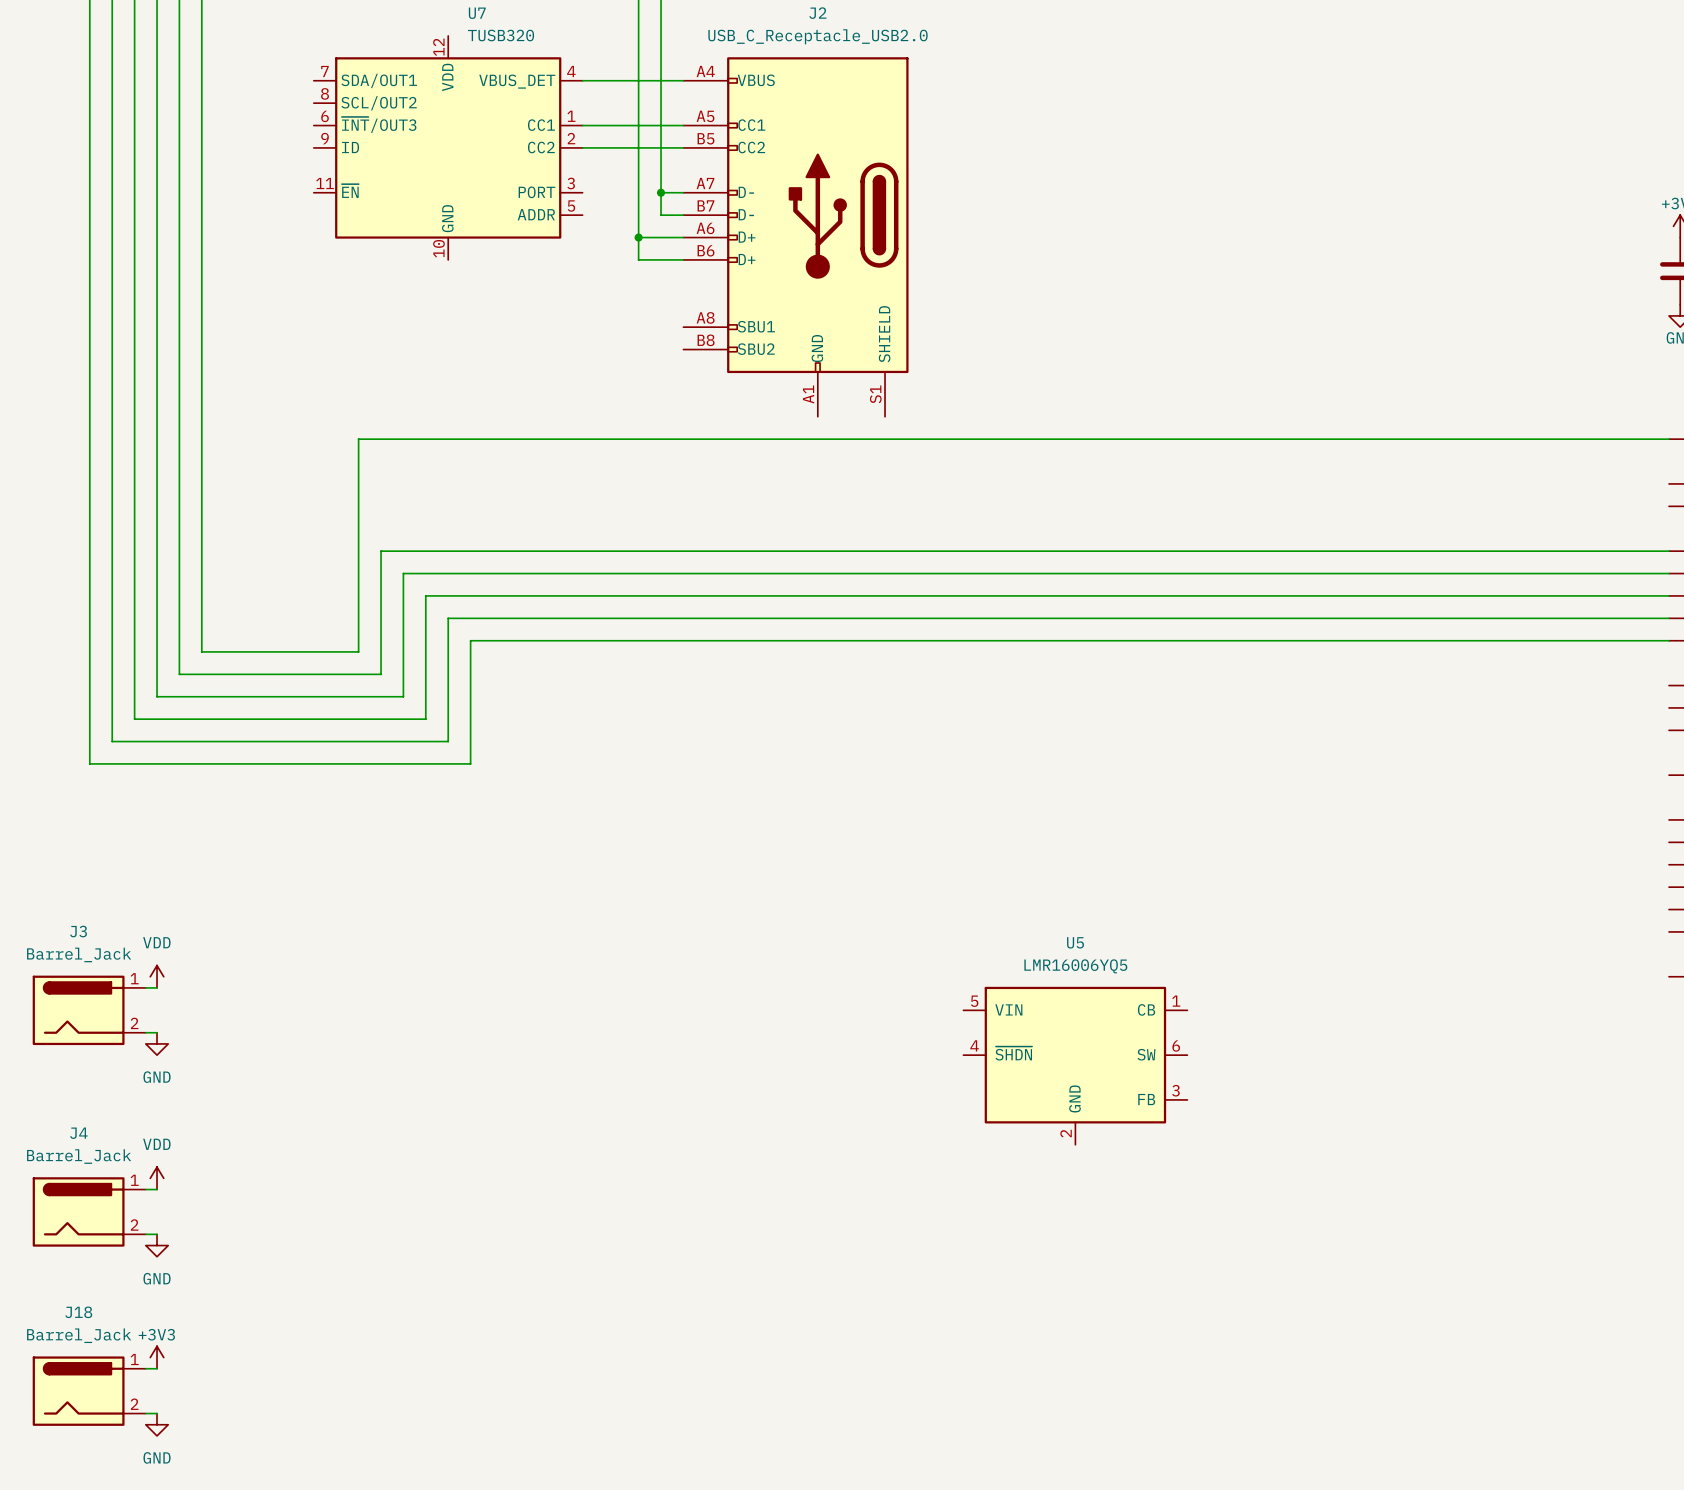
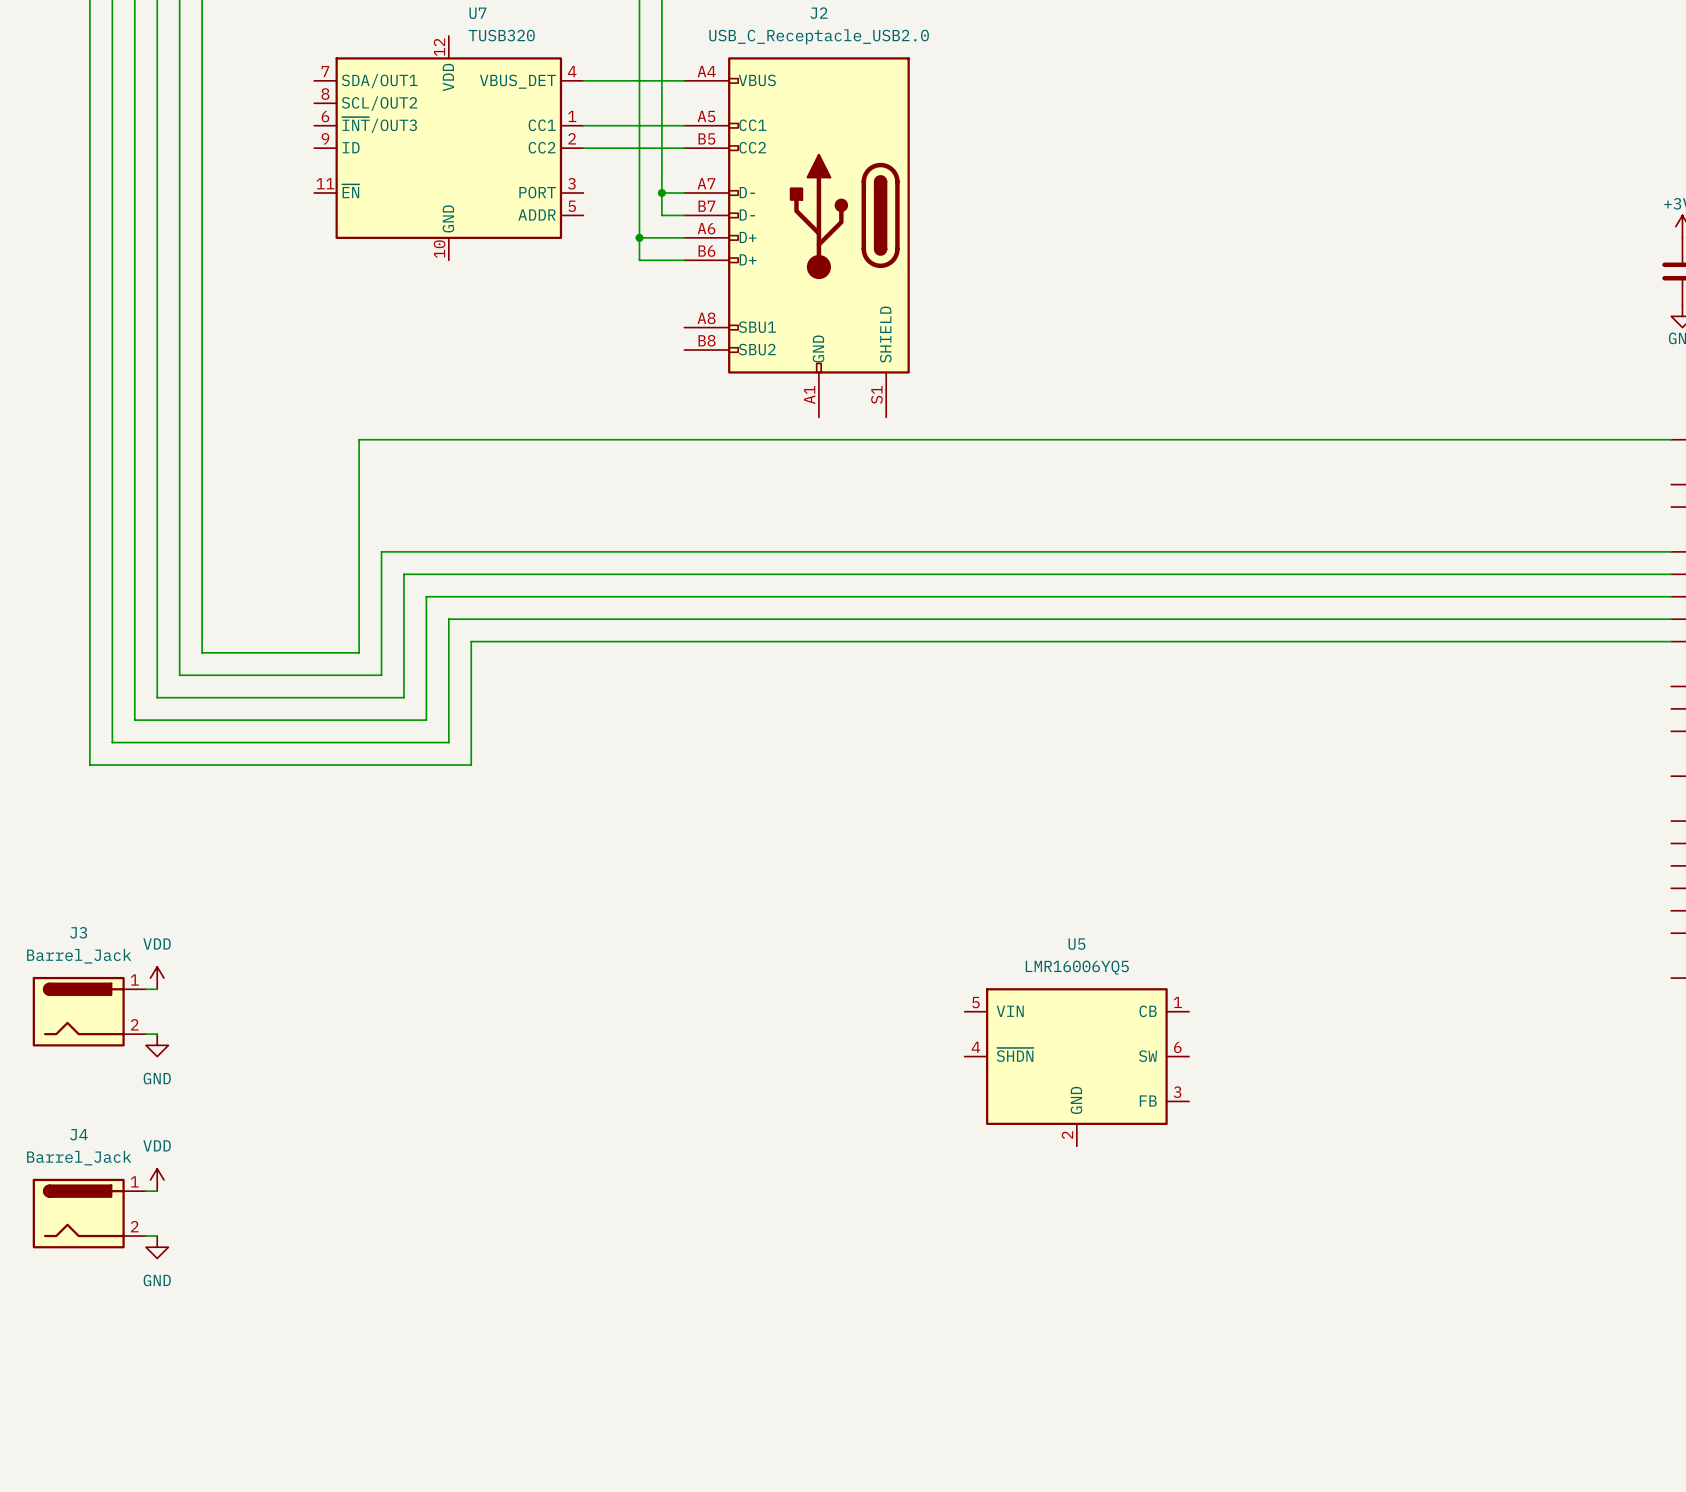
power symbol: +3V3 (157, 1357) -> none
wire: (145, 1368) (157, 1368) -> none
J18: Barrel_Jack (89, 1391) -> none
wire: (145, 1413) (157, 1413) -> none
power symbol: GND (157, 1424) -> none

